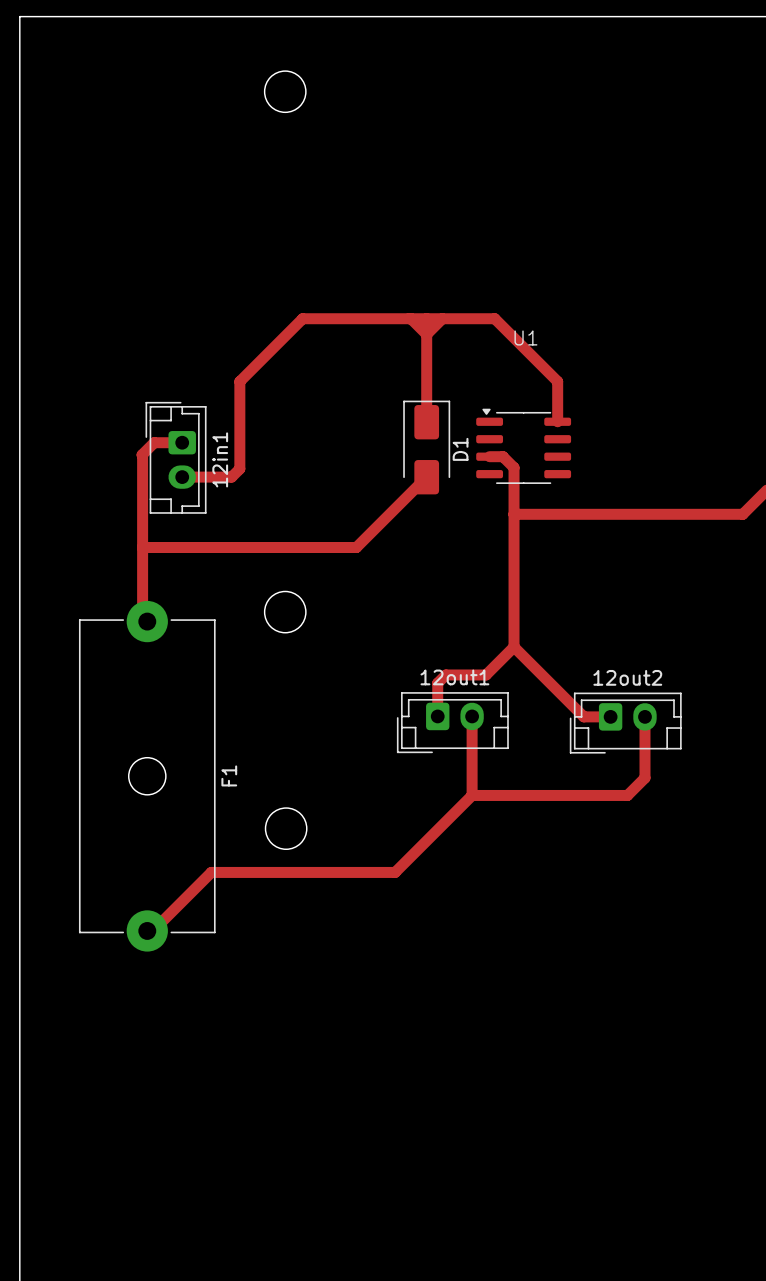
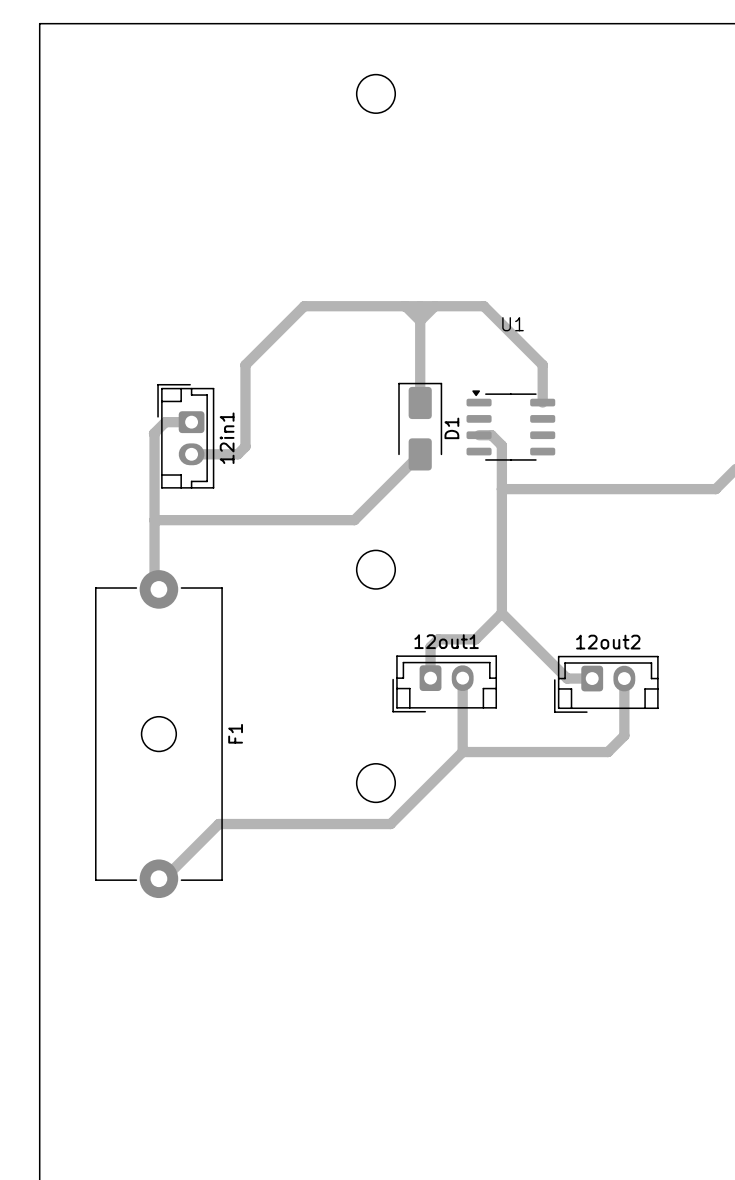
round board edge position: (285, 91) -> (375, 93)
round board edge position: (285, 612) -> (375, 569)
round board edge position: (286, 828) -> (375, 783)

